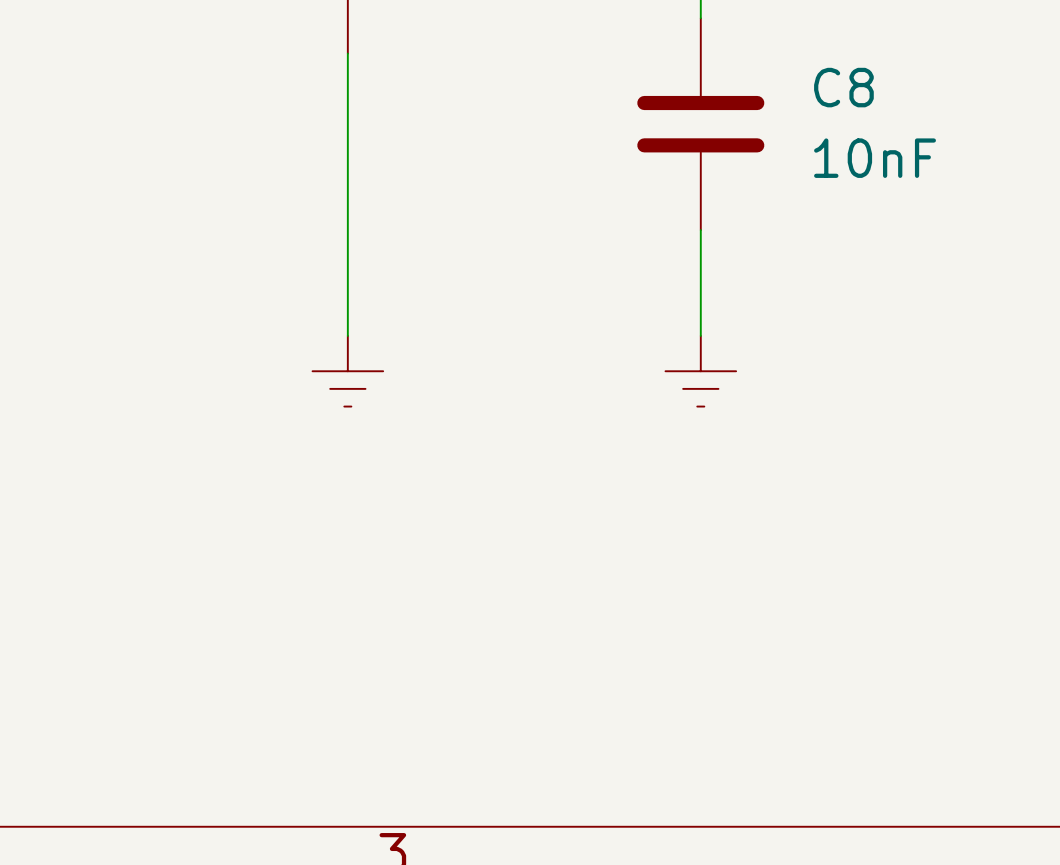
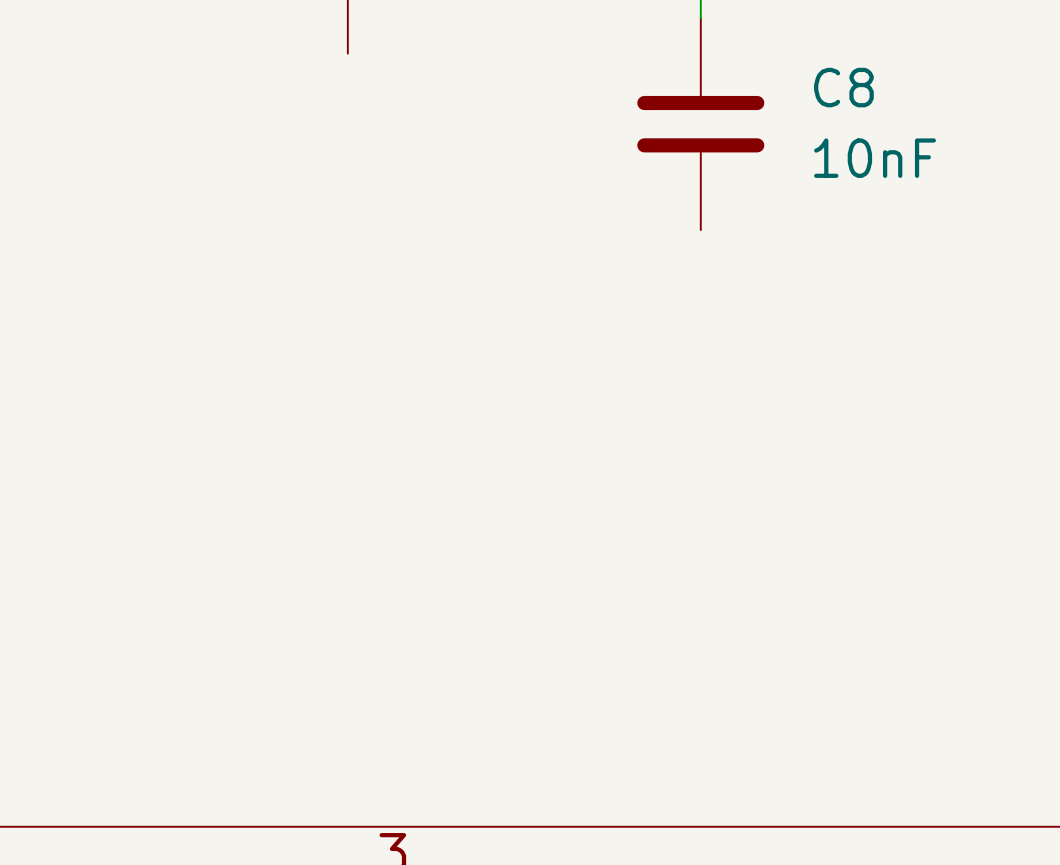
wire: (347, 53) (347, 335) -> none
wire: (700, 230) (700, 335) -> none
power symbol: (347, 371) -> none
power symbol: (700, 371) -> none

